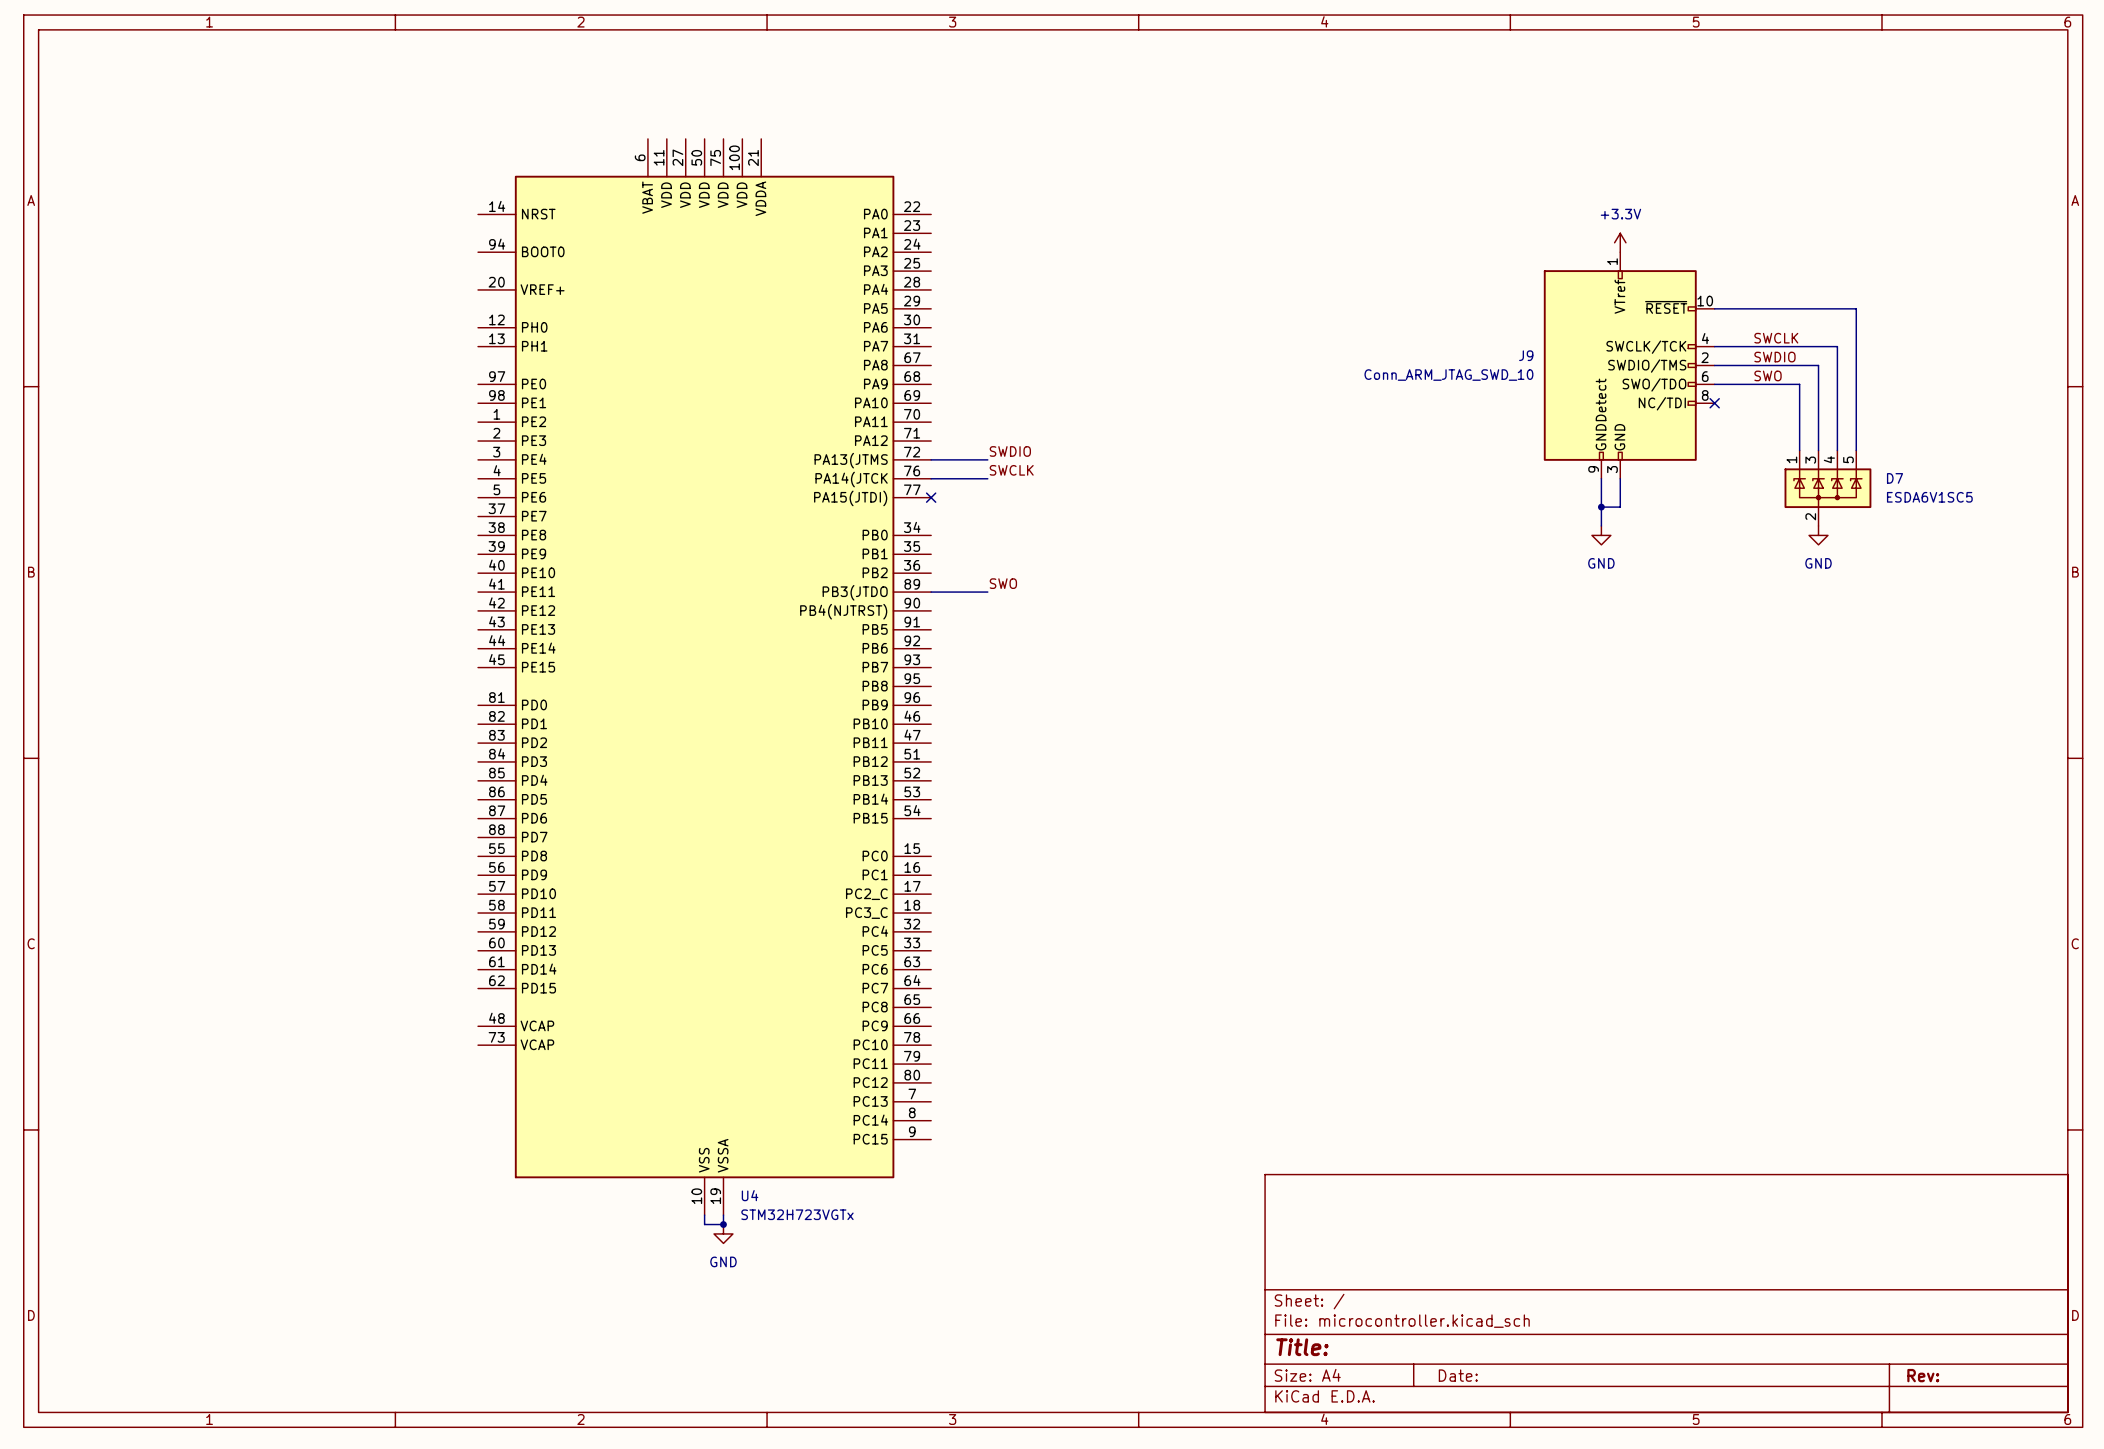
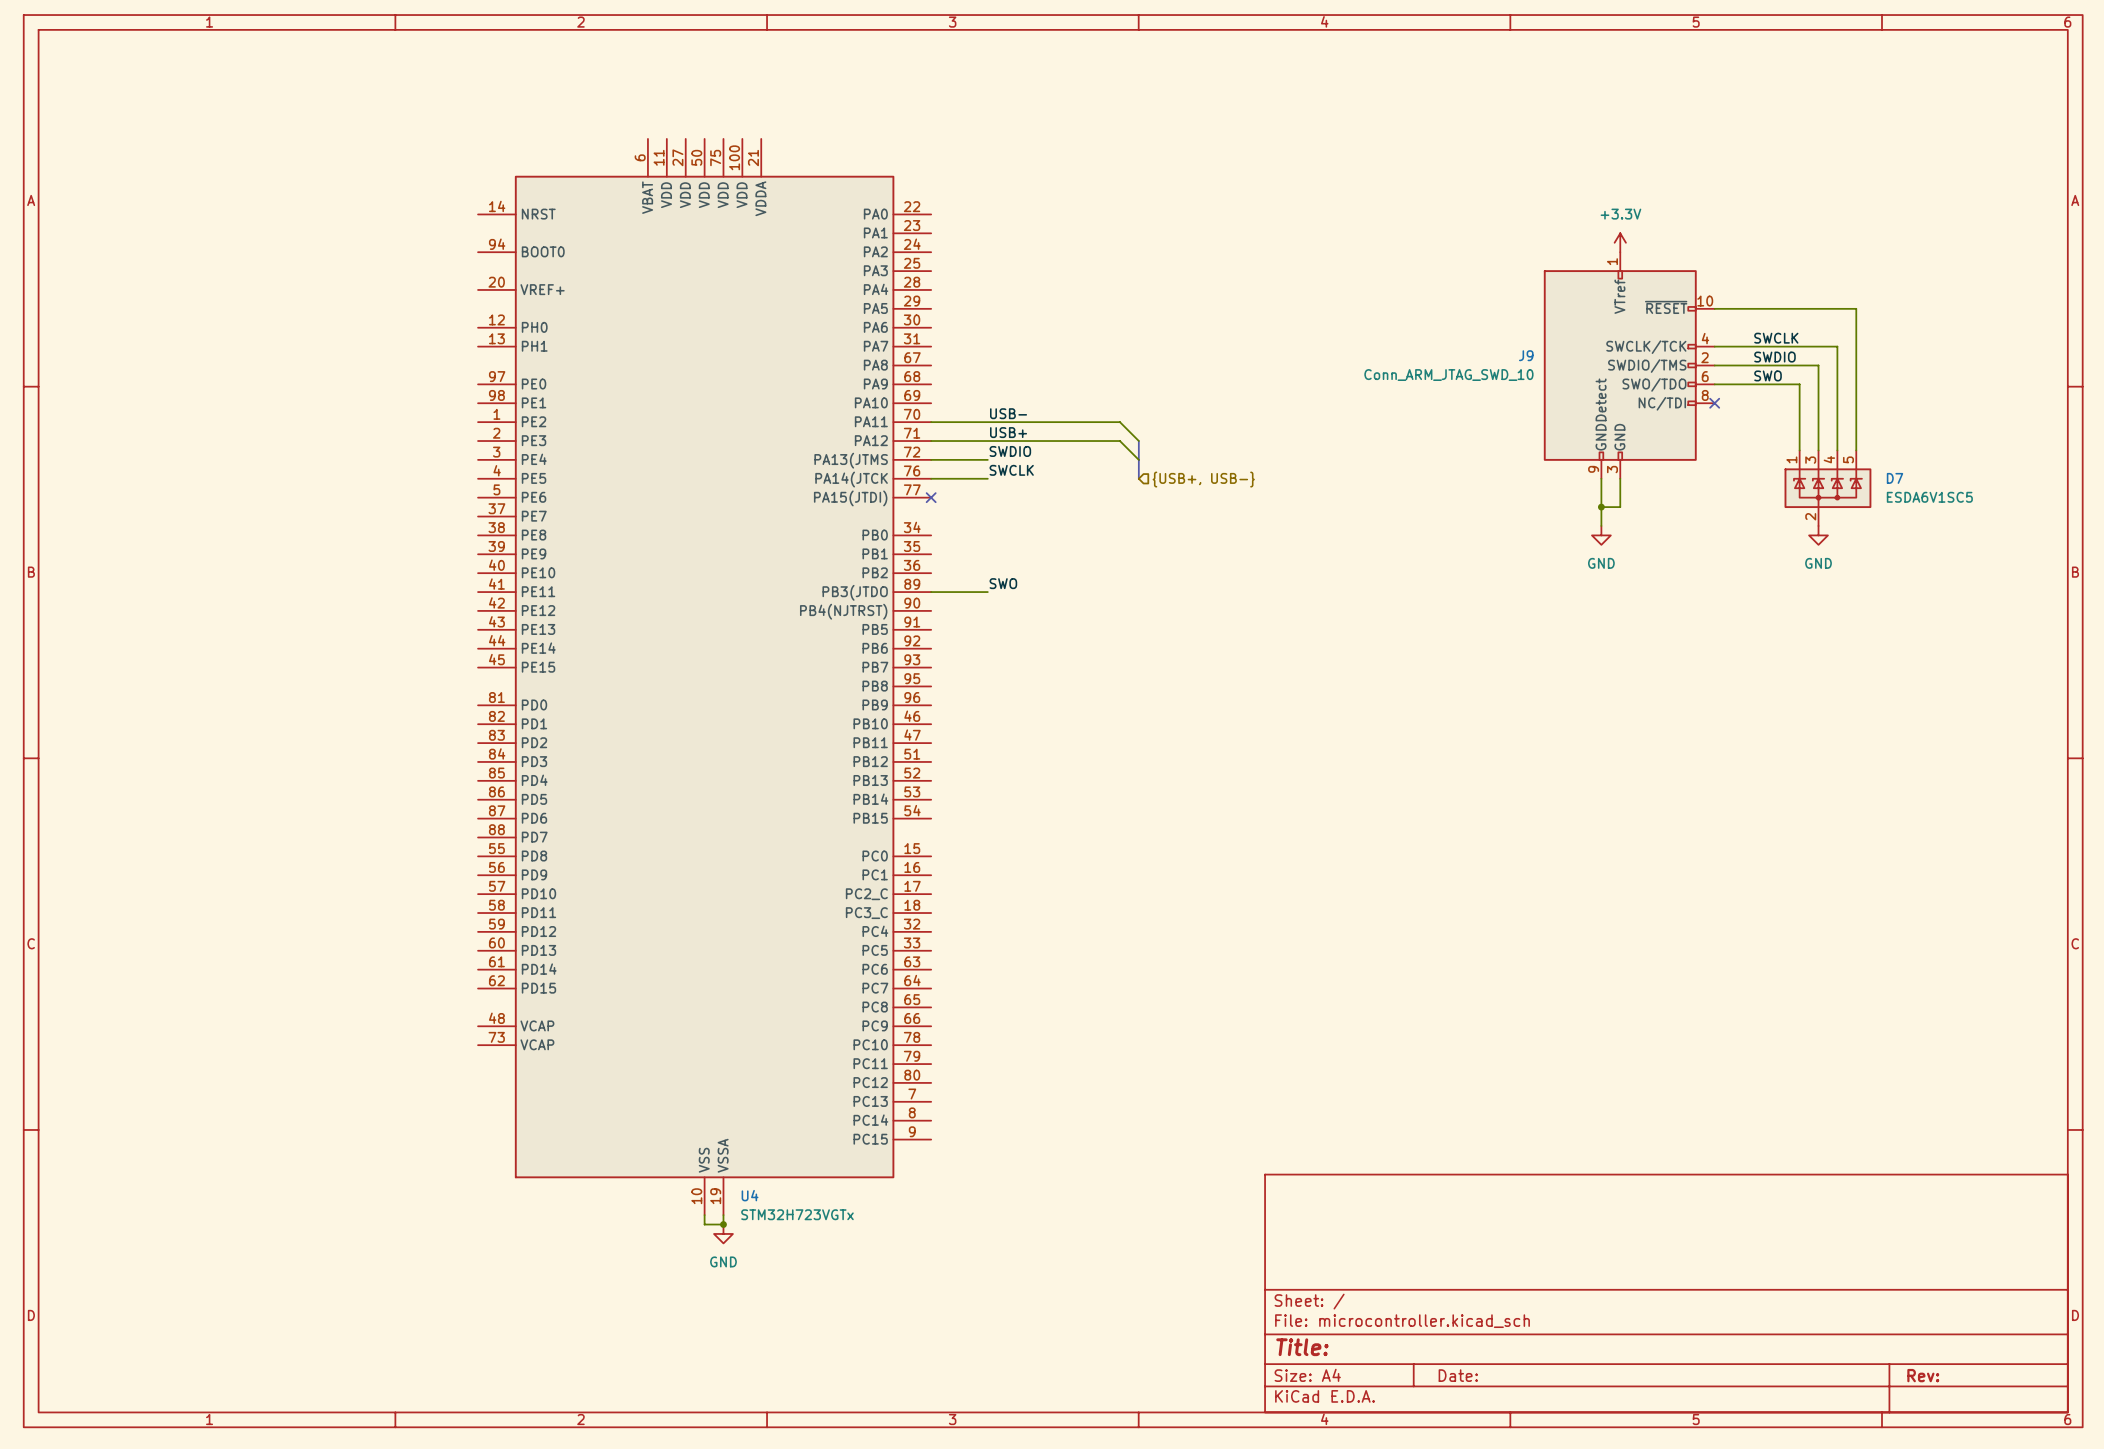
label: none -> USB- (1008, 413)
wire: none -> (931, 422) (1119, 422) (1138, 441)
label: none -> USB+ (1008, 432)
wire: none -> (931, 441) (1119, 441) (1138, 459)
bus: none -> (1138, 441) (1138, 478)
hierarchical label: none -> {USB+, USB-} (1203, 479)

